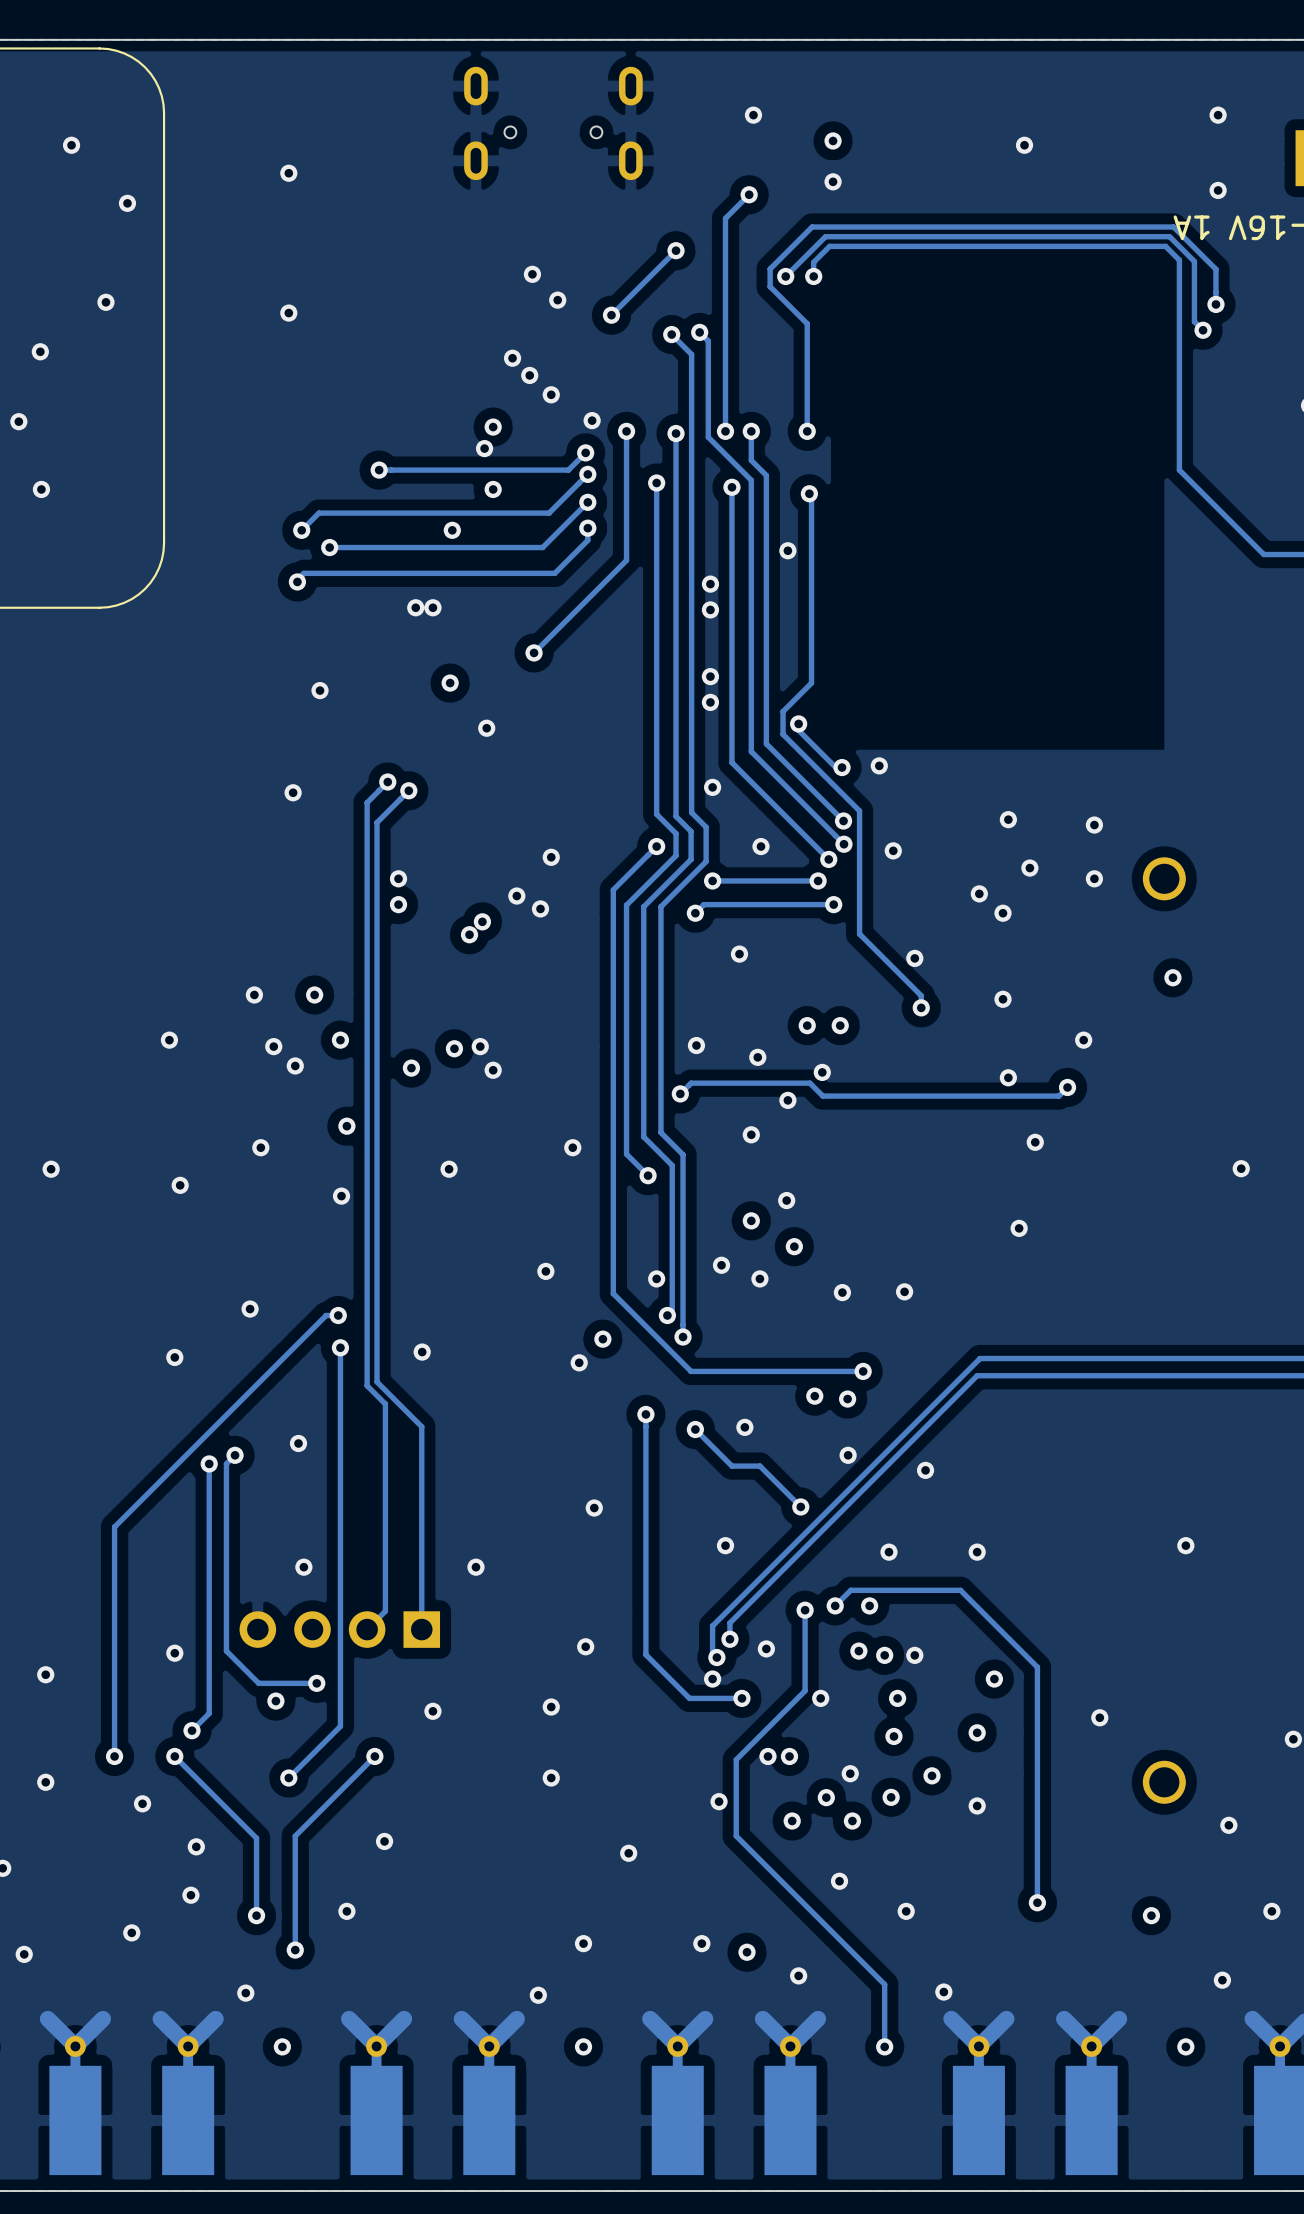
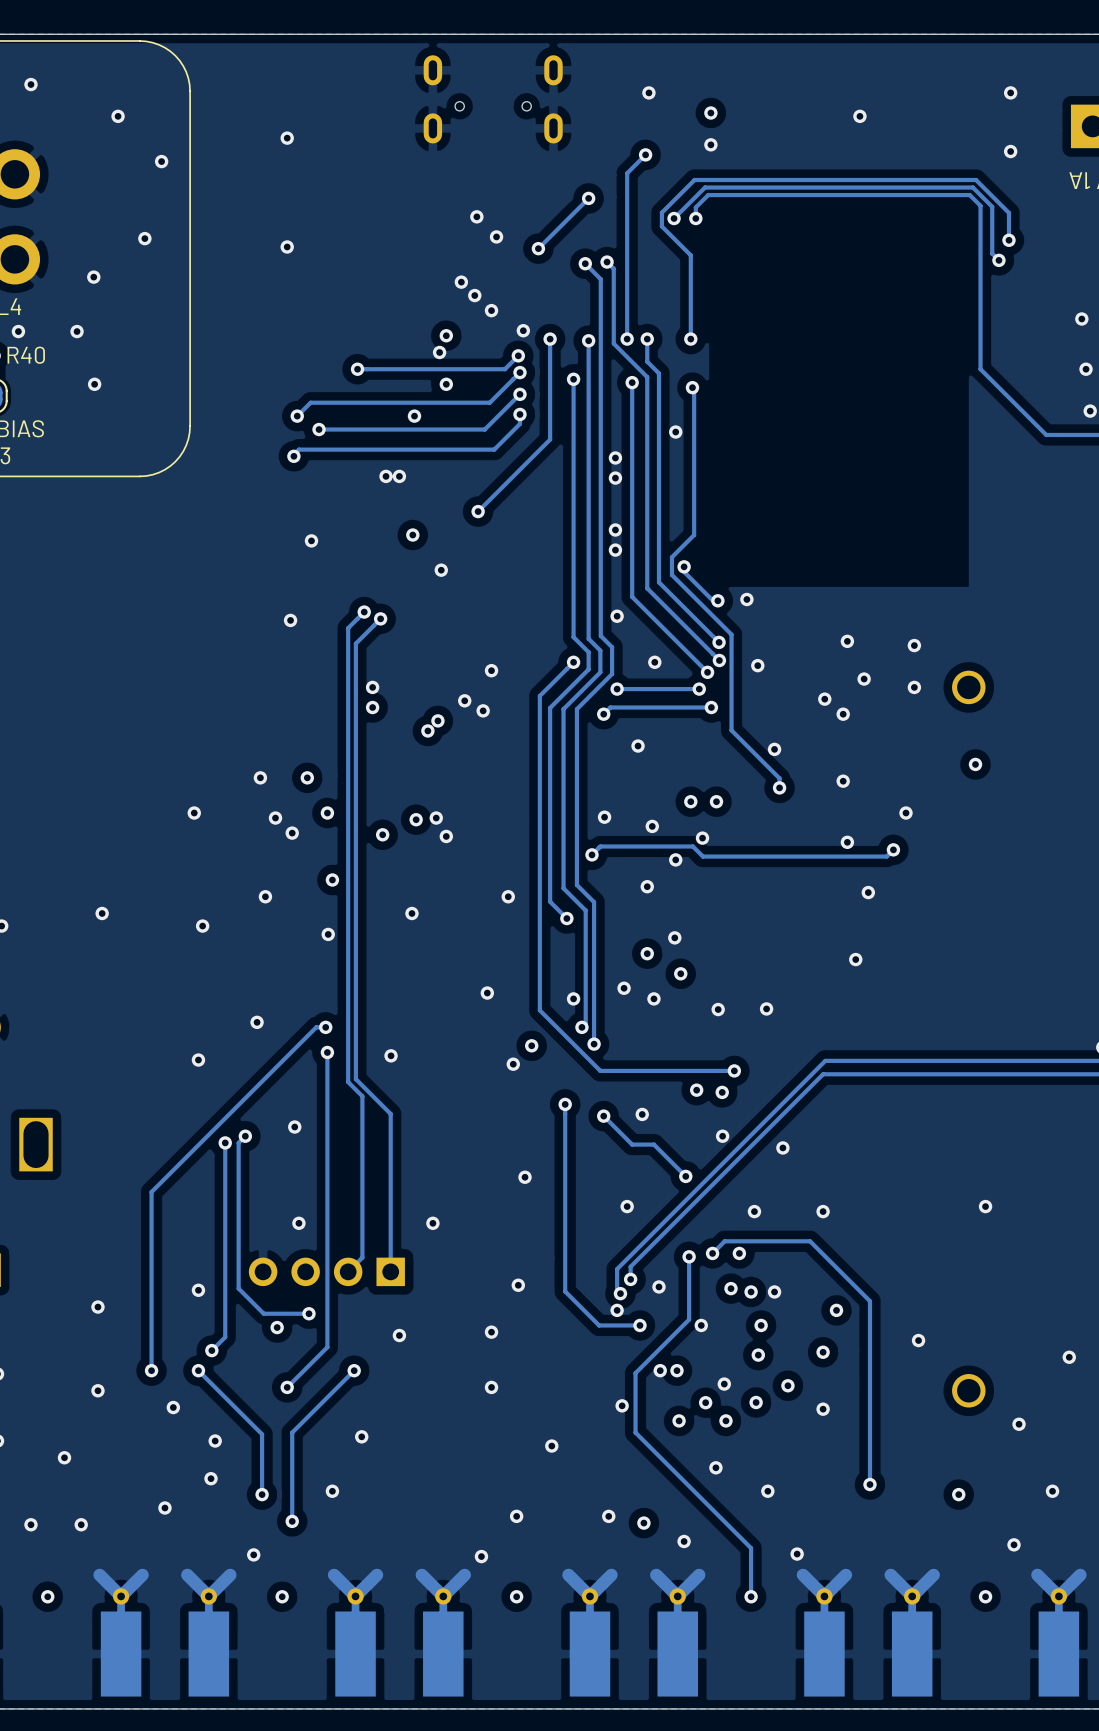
via: (1241, 1168) -> none

